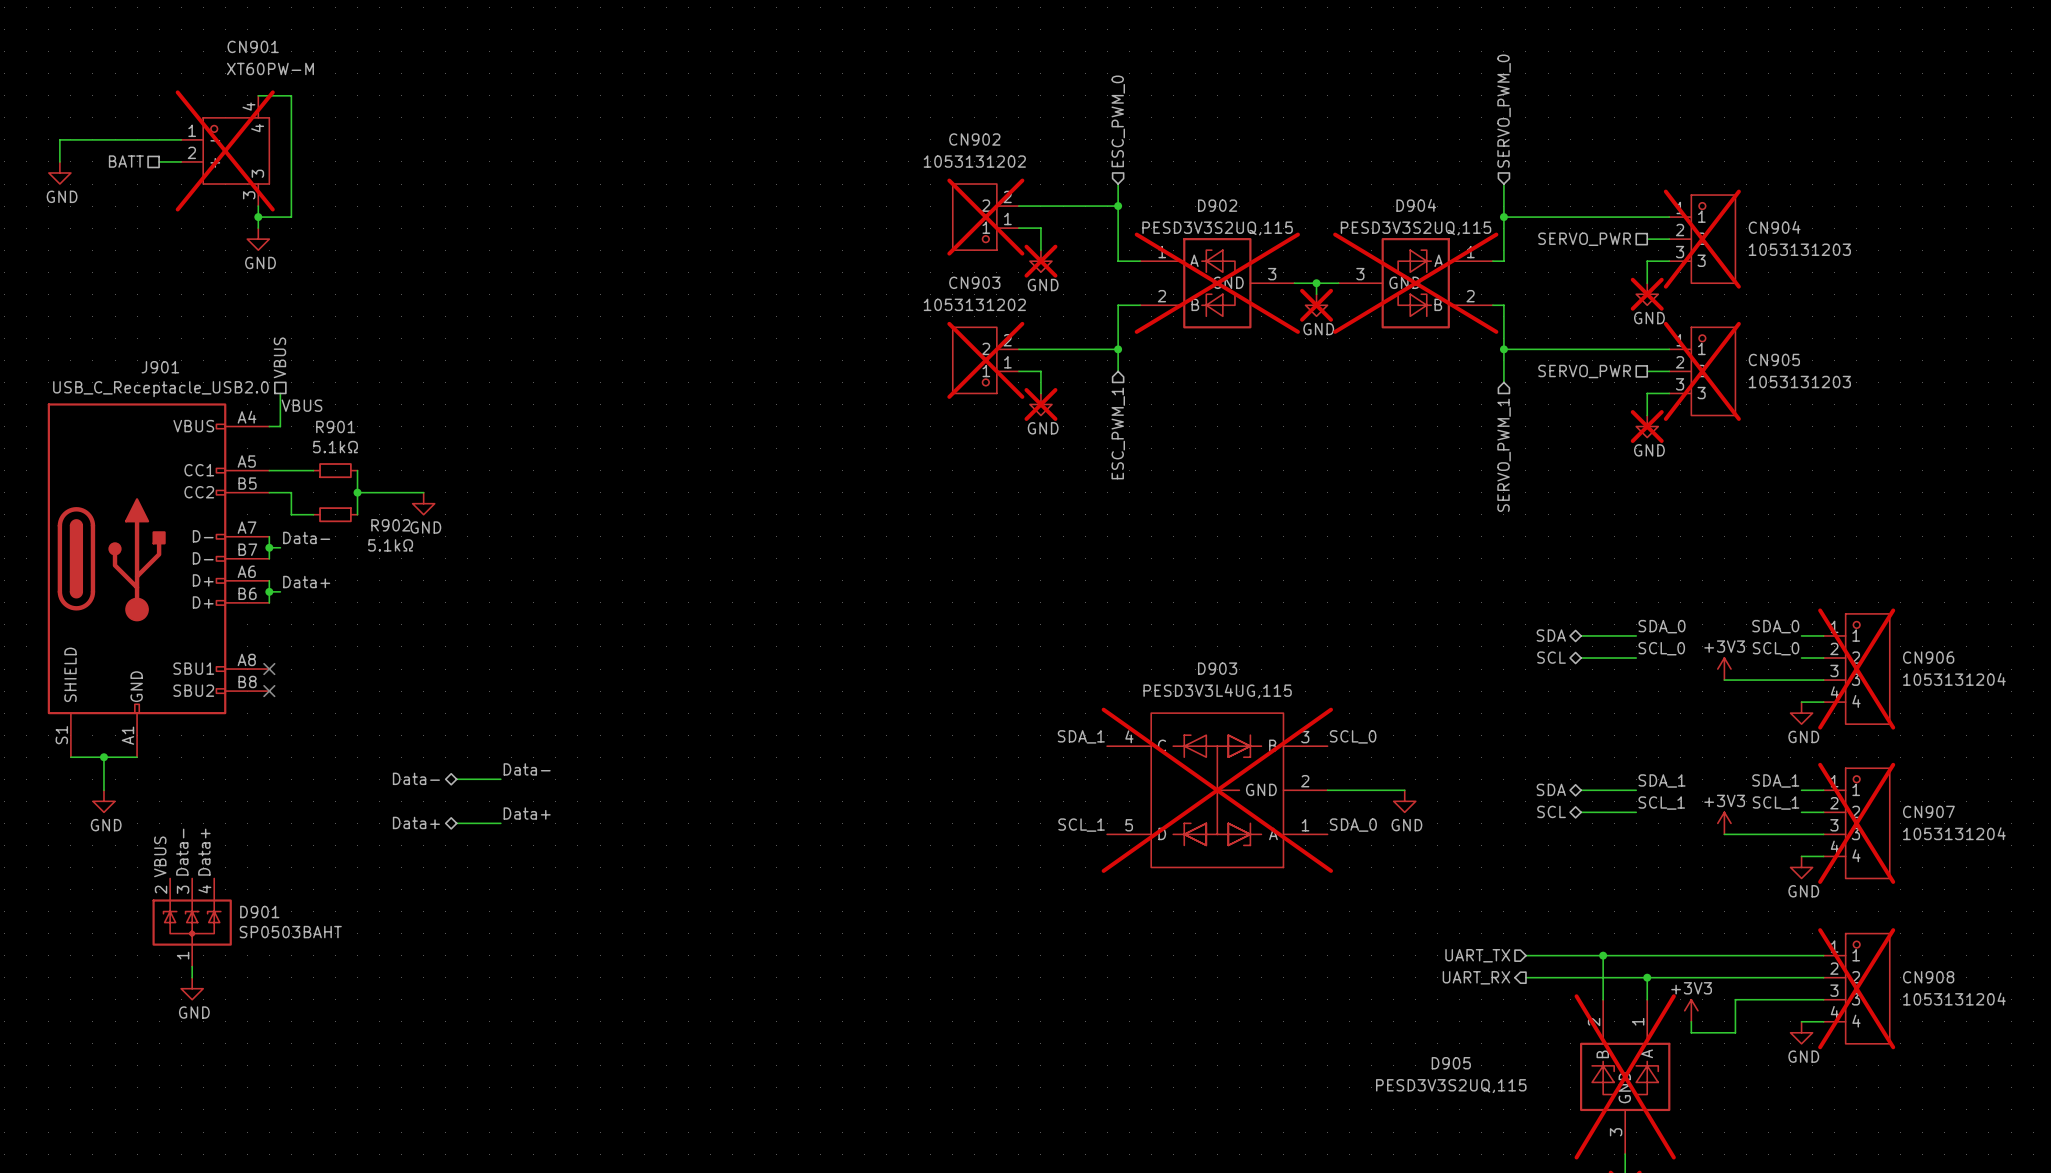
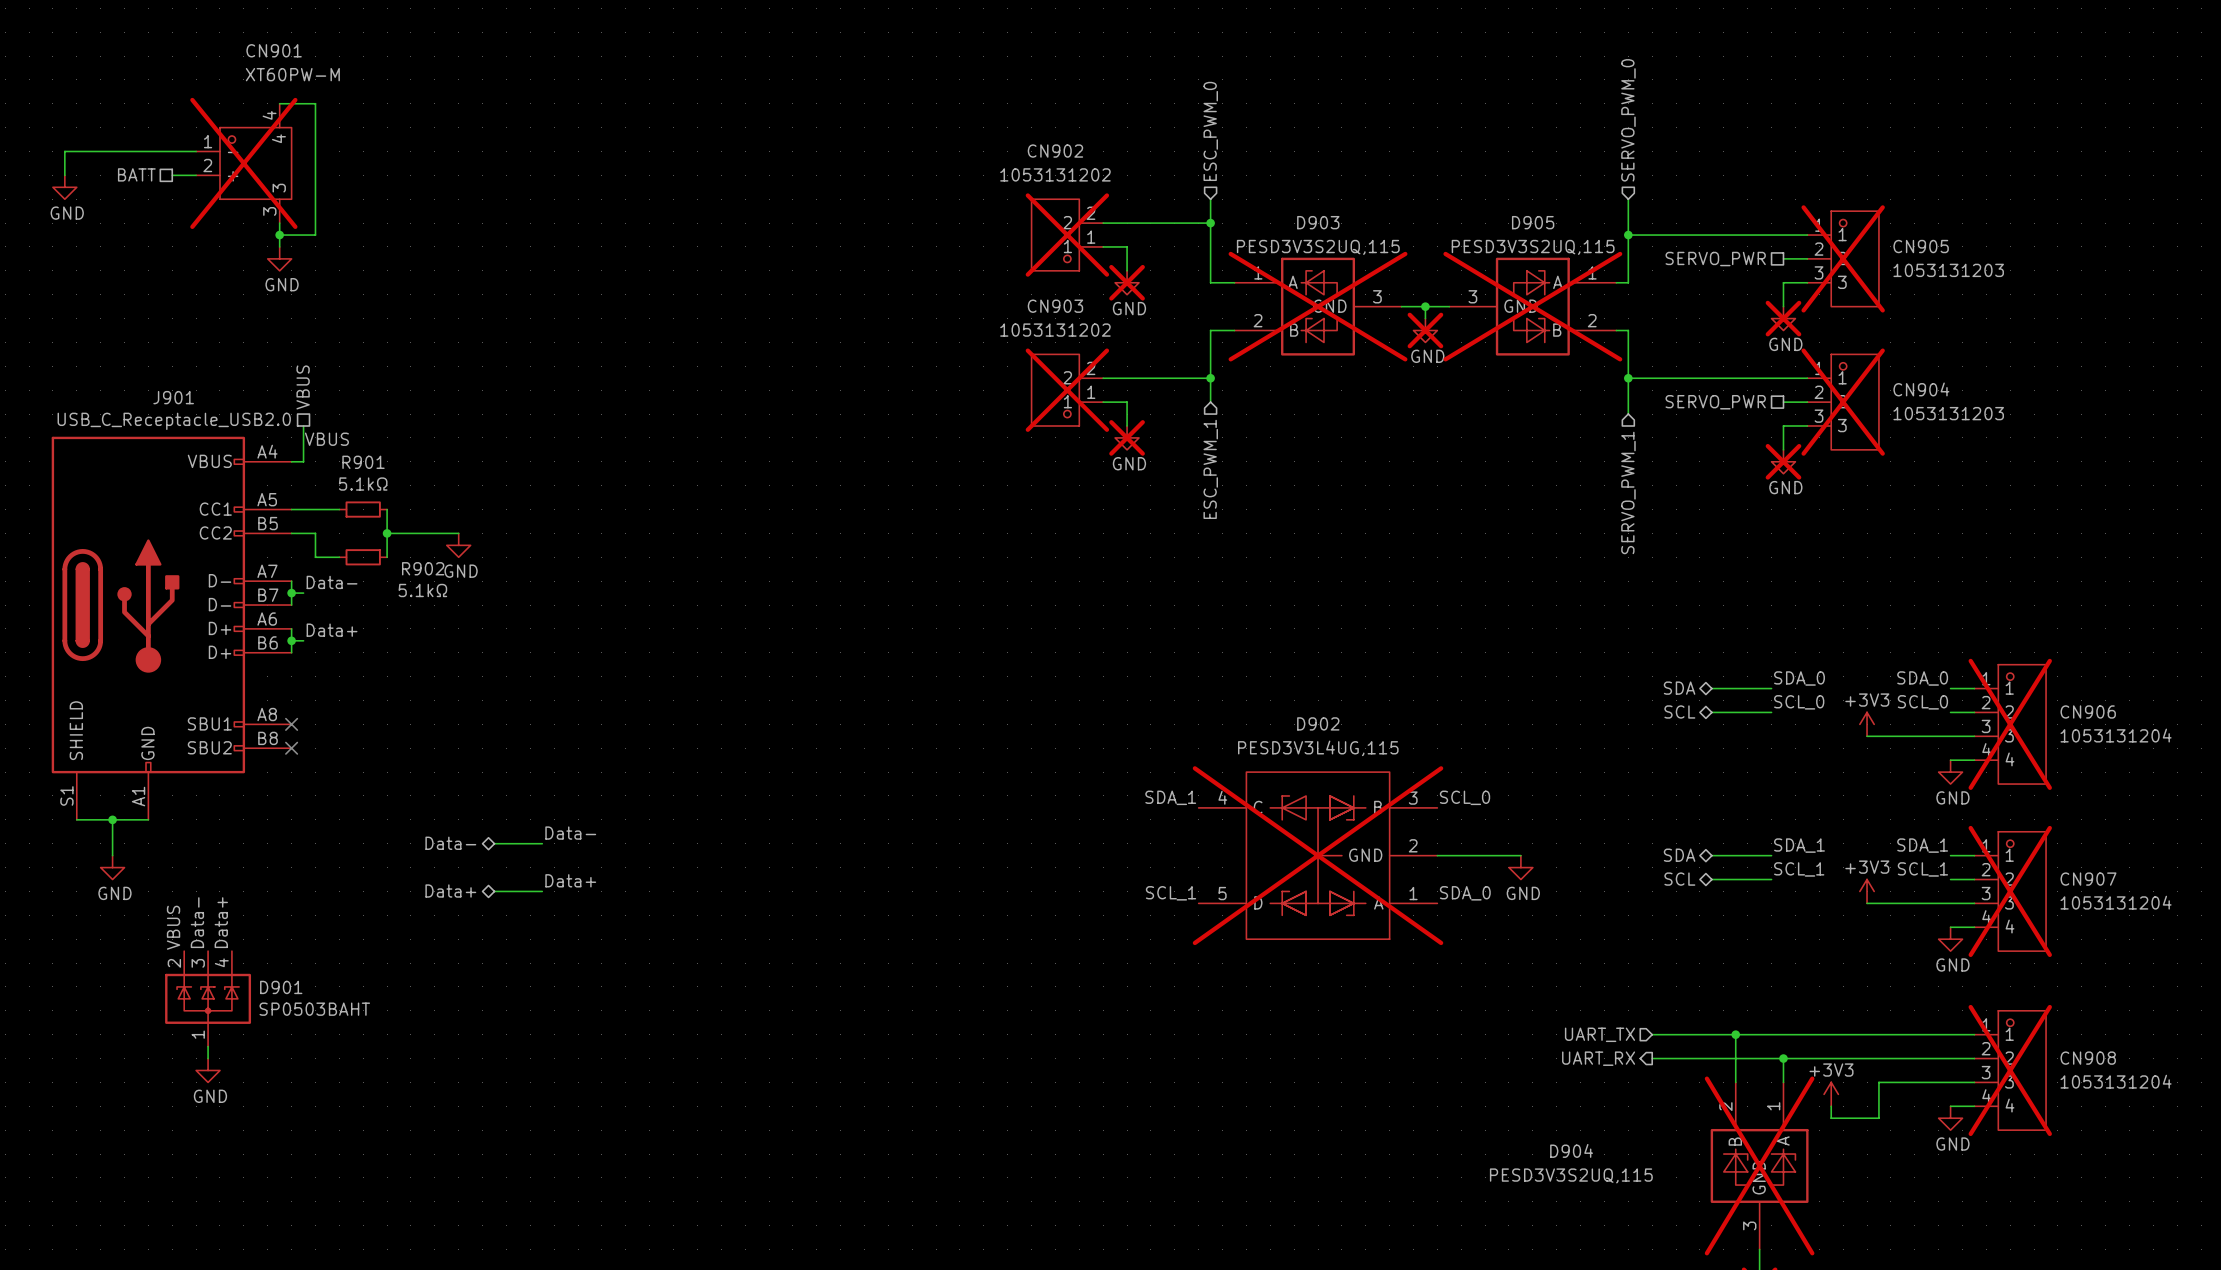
D902 name: D902 (1217, 205) -> D903 (1318, 222)
D904 name: D904 (1416, 205) -> D905 (1533, 222)
CN904 name: CN904 (1774, 227) -> CN905 (1921, 246)
CN905 name: CN905 (1774, 359) -> CN904 (1921, 389)
D903 name: D903 (1217, 668) -> D902 (1318, 723)
D905 name: D905 (1451, 1063) -> D904 (1571, 1150)

